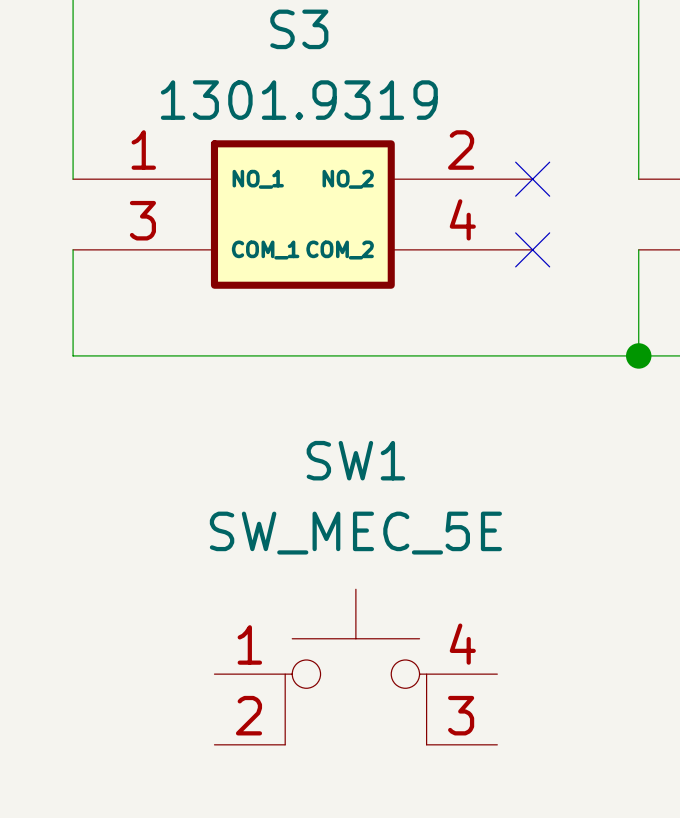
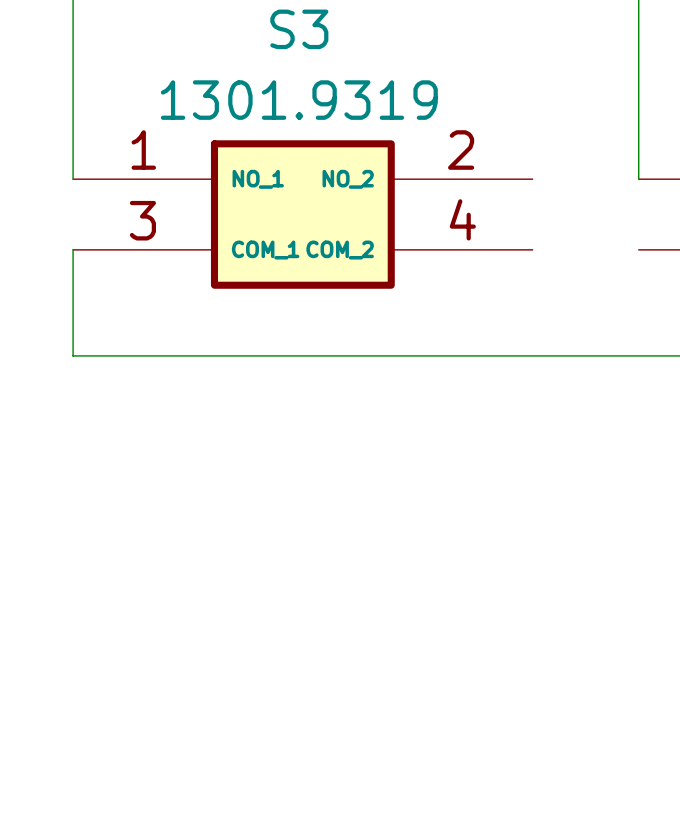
no-connect mark: (532, 179) -> none
no-connect mark: (532, 249) -> none
wire: (638, 249) (638, 355) -> none
junction: (638, 355) -> none
SW1: SW_MEC_5E (355, 667) -> none

